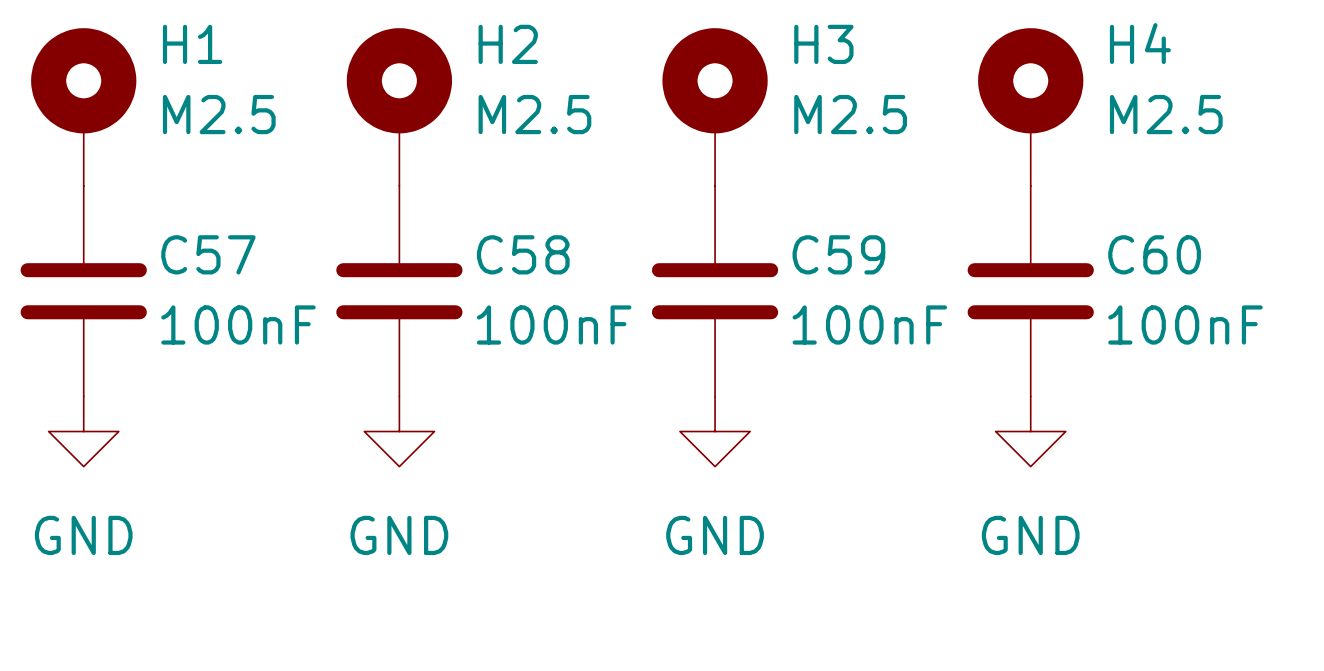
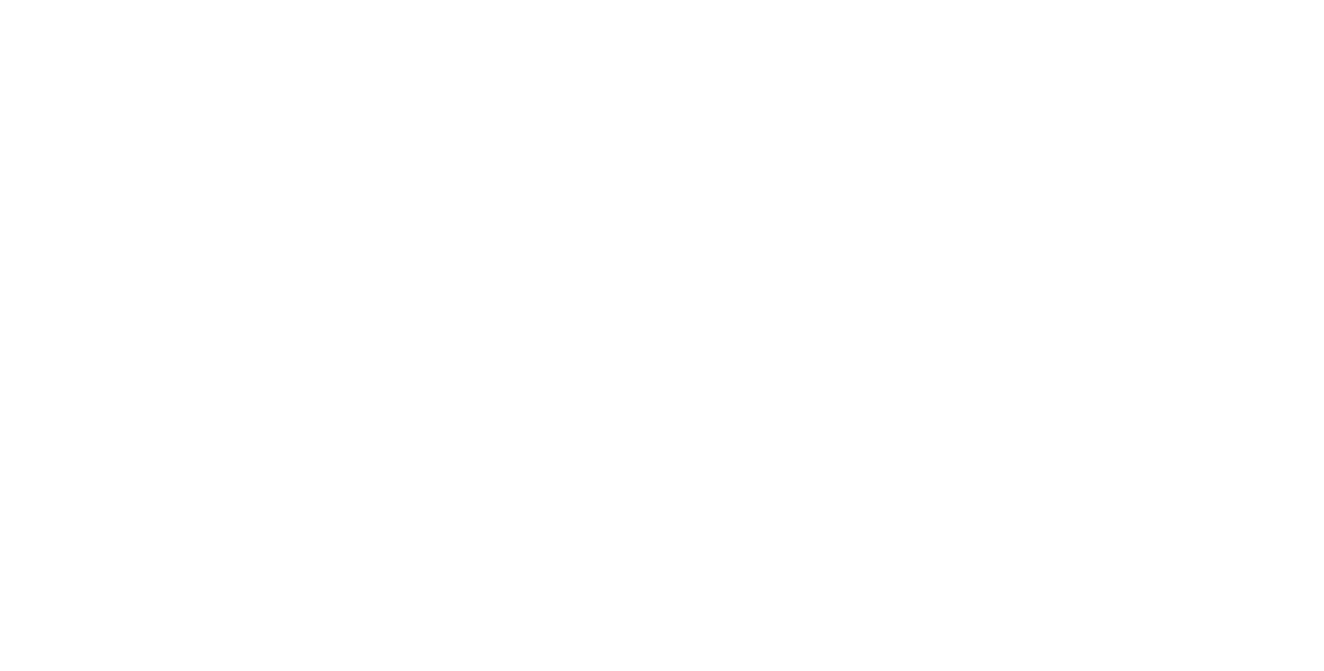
H1: M2.5 (83, 107) -> none
H2: M2.5 (399, 107) -> none
H3: M2.5 (715, 107) -> none
H4: M2.5 (1030, 107) -> none
C57: 100nF (83, 291) -> none
C58: 100nF (399, 291) -> none
C59: 100nF (715, 291) -> none
C60: 100nF (1030, 291) -> none
power symbol: GND (83, 431) -> none
power symbol: GND (399, 431) -> none
power symbol: GND (715, 431) -> none
power symbol: GND (1030, 431) -> none

